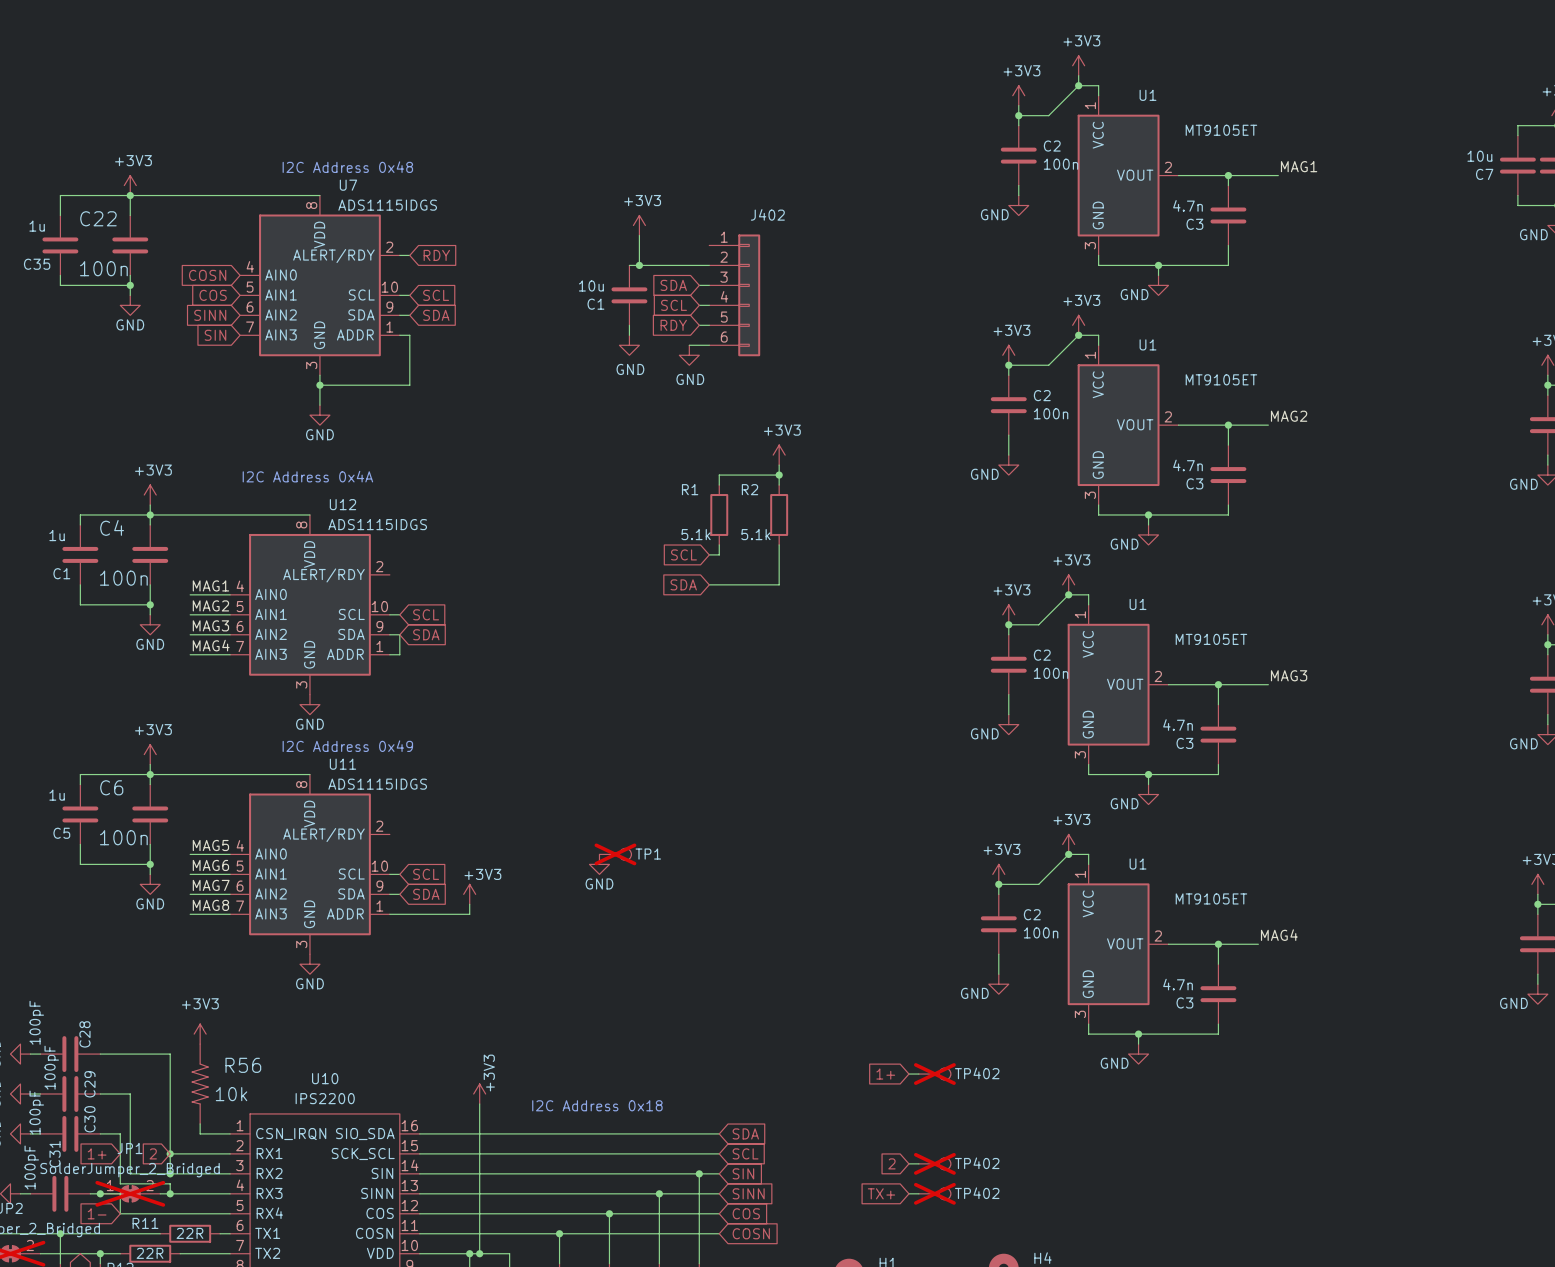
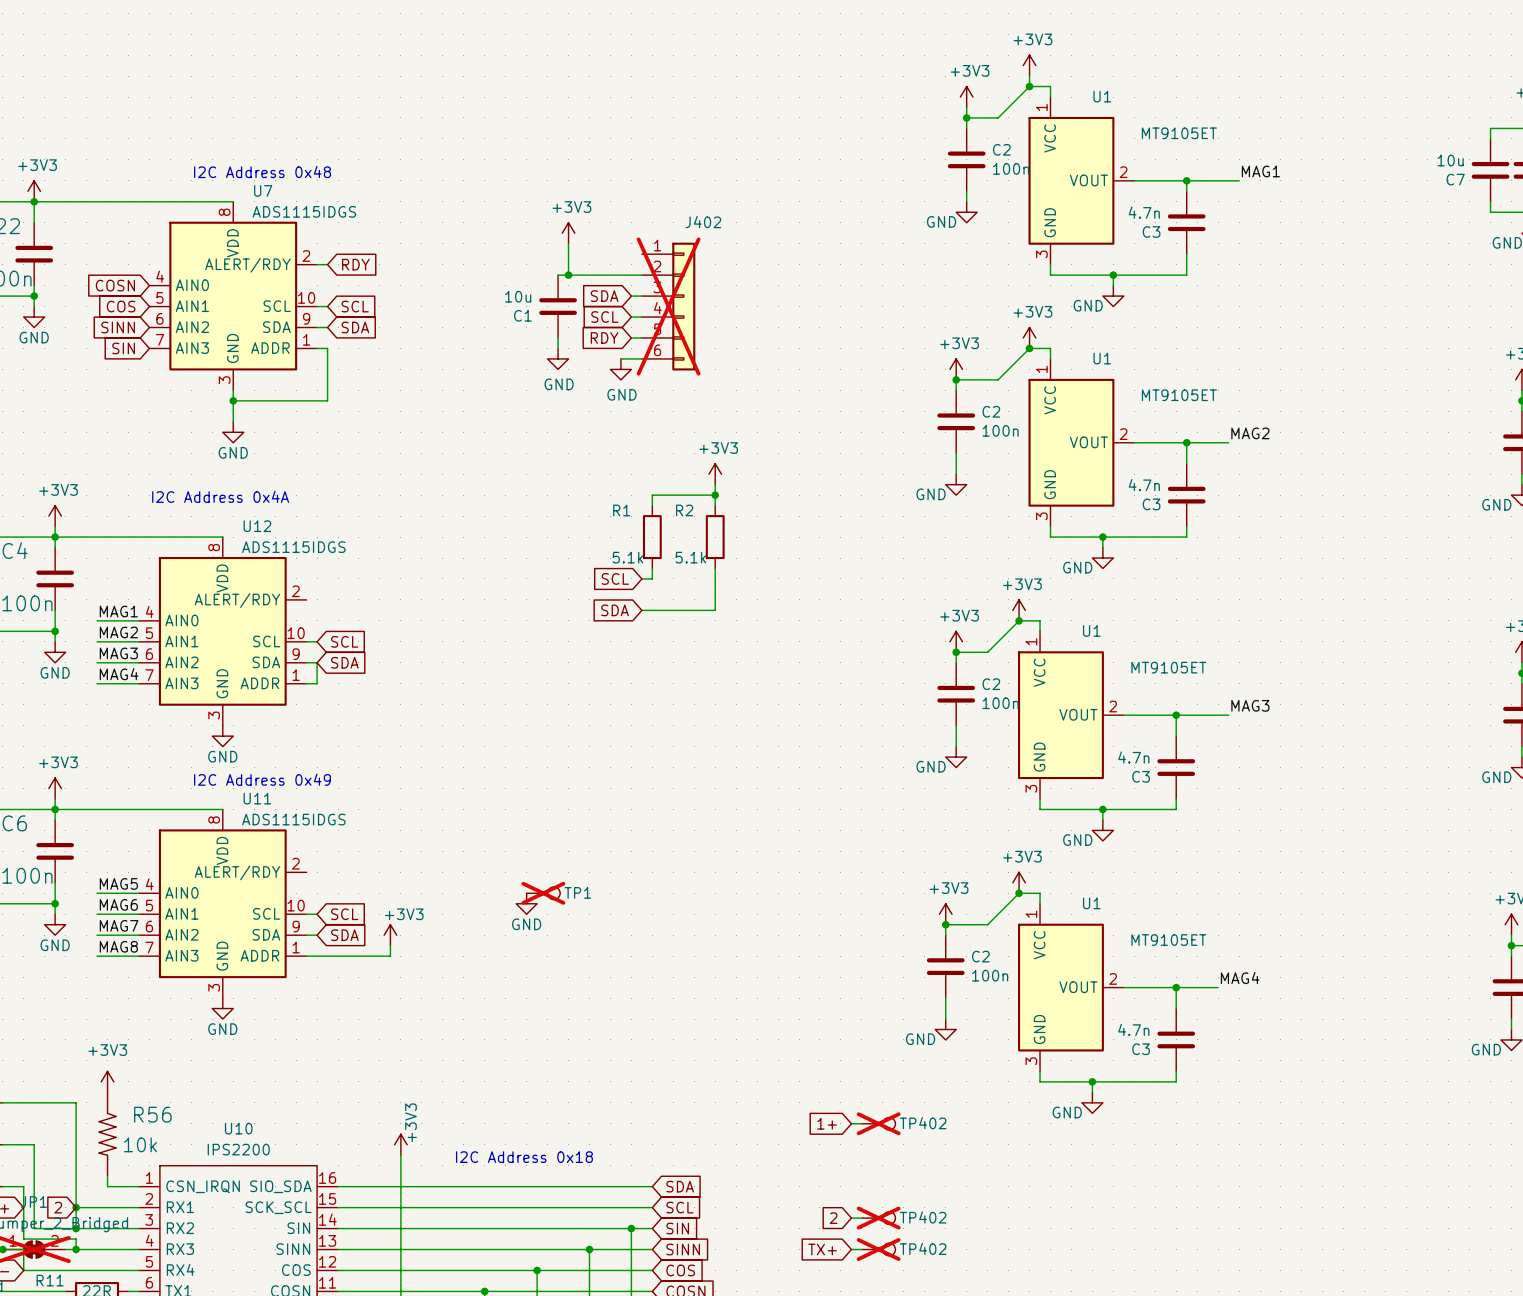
J402 do-not-place cross: none -> (668, 306)

